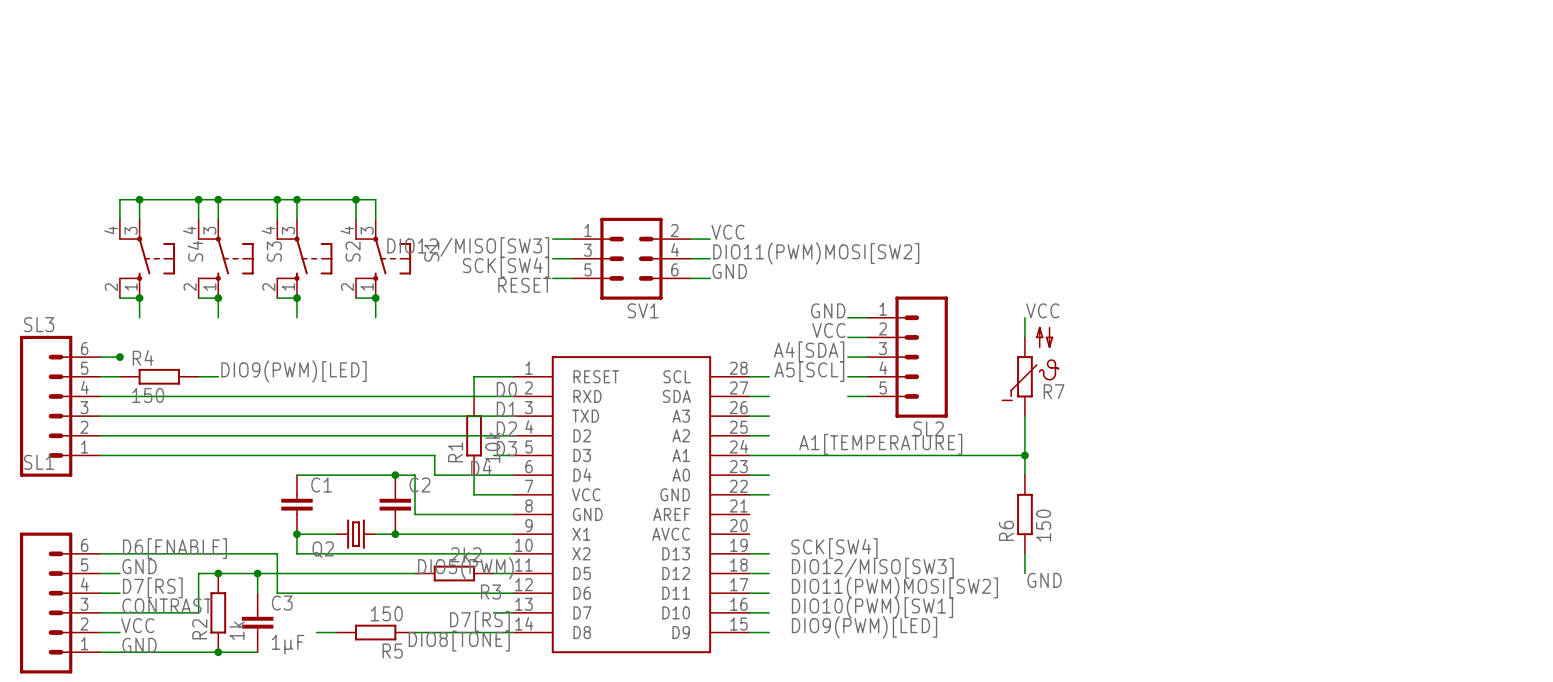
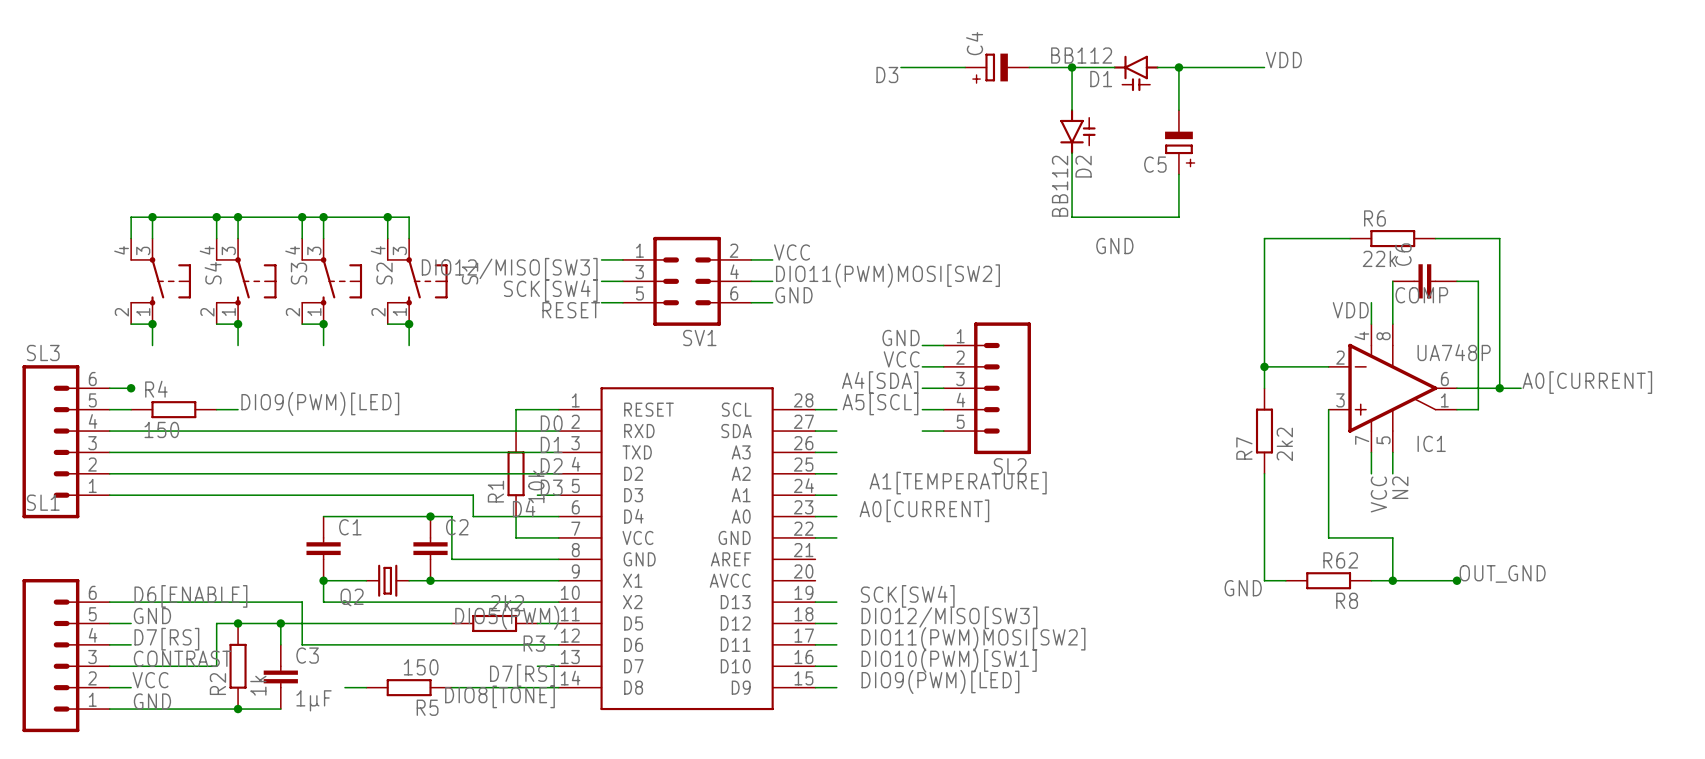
label: none -> VDD (1283, 60)
wire: none -> (900, 67) (965, 67)
C4: none -> (997, 67)
wire: none -> (1029, 67) (1114, 67)
wire: none -> (1072, 67) (1072, 110)
junction: none -> (1072, 67)
wire: none -> (1157, 67) (1264, 67)
wire: none -> (1178, 67) (1178, 110)
junction: none -> (1178, 67)
D1: none -> BB112 (1136, 73)
label: none -> D3 (887, 74)
D2: none -> BB112 (1077, 131)
C5: none -> (1178, 142)
wire: none -> (1072, 153) (1072, 217) (1178, 217) (1178, 174)
wire: none -> (1350, 238) (1264, 238) (1264, 388)
wire: none -> (1435, 238) (1499, 238) (1499, 388)
label: none -> GND (1114, 246)
wire: none -> (1392, 281) (1392, 324)
C6: none -> (1424, 281)
wire: none -> (1456, 281) (1478, 281) (1478, 409) (1456, 409)
label: none -> COMP (1421, 295)
wire: none -> (1371, 302) (1371, 324)
label: none -> VDD (1350, 310)
label: VCC (1042, 310) -> none
wire: (1024, 317) (1024, 337) -> none
R7 symbol: [1001, 327, 1059, 417] -> [1255, 388, 1274, 474]
wire: none -> (1264, 366) (1328, 366)
junction: none -> (1264, 366)
label: none -> A0[CURRENT] (1587, 382)
IC1: none -> UA748P (1392, 388)
wire: none -> (1456, 388) (1521, 388)
junction: none -> (1499, 388)
wire: none -> (1328, 409) (1328, 537) (1392, 537) (1392, 580)
R7 name position: R7 (1054, 391) -> R7 (1244, 448)
R7 value: none -> 2k2 (1284, 444)
wire: (1024, 416) (1024, 475) -> none
wire: none -> (1371, 452) (1371, 473)
wire: none -> (1392, 452) (1392, 473)
wire: none -> (1264, 473) (1264, 580) (1285, 580)
label: none -> N2 (1400, 487)
label: none -> VCC (1378, 494)
wire: (769, 455) (1024, 455) -> none
junction: (1024, 455) -> none
label: none -> A0[CURRENT] (924, 510)
R6 rotation: 0° (1024, 514) -> 90° clockwise (1392, 238)
R6 position: (1024, 514) -> (1392, 238)
R6 value: 150 (1043, 525) -> 22k (1379, 258)
label: none -> OUT_GND (1502, 573)
R8: none -> R62 (1328, 580)
wire: none -> (1371, 580) (1456, 580)
junction: none -> (1392, 580)
junction: none -> (1456, 580)
wire: (1024, 553) (1024, 573) -> none
label position: GND (1044, 580) -> GND (1243, 588)

